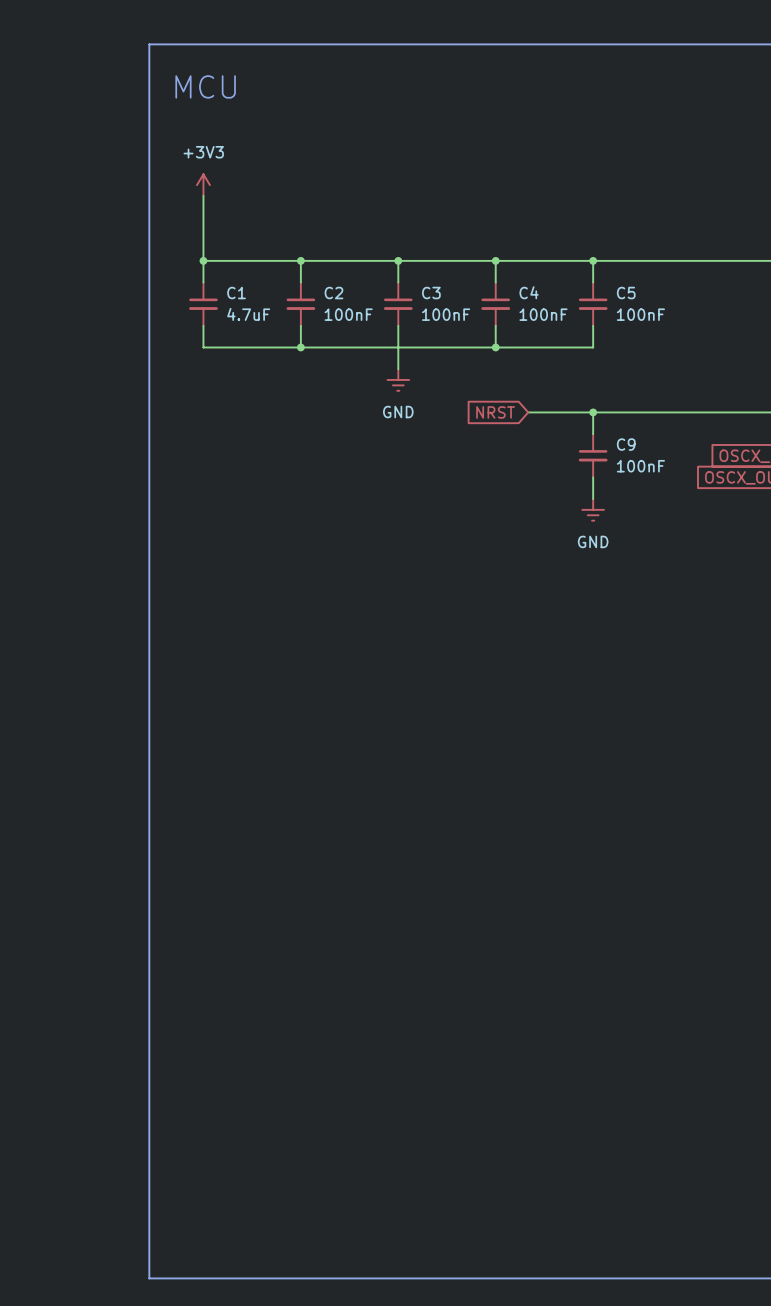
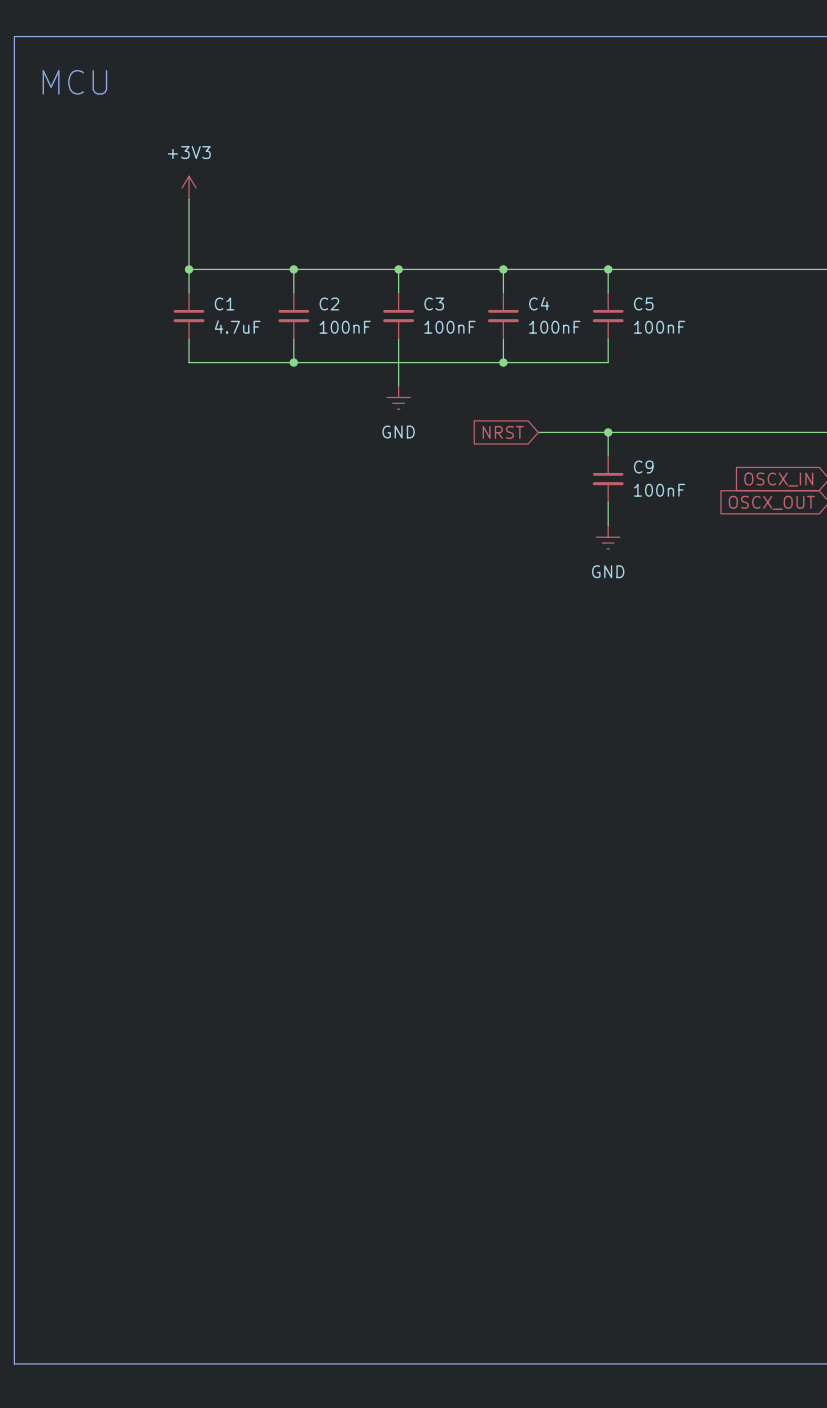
line: (149, 44) (149, 1278) -> (130, 36) (14, 36) (14, 1363) (130, 1363)
text position: MCU (205, 86) -> MCU (74, 82)

